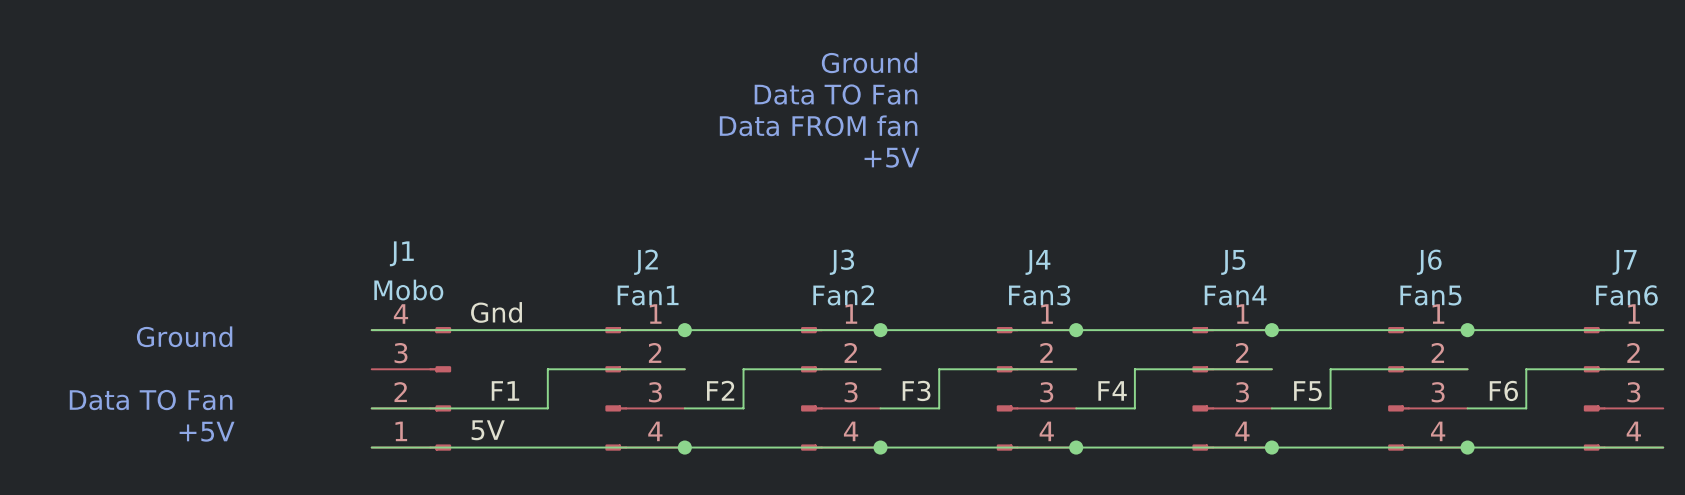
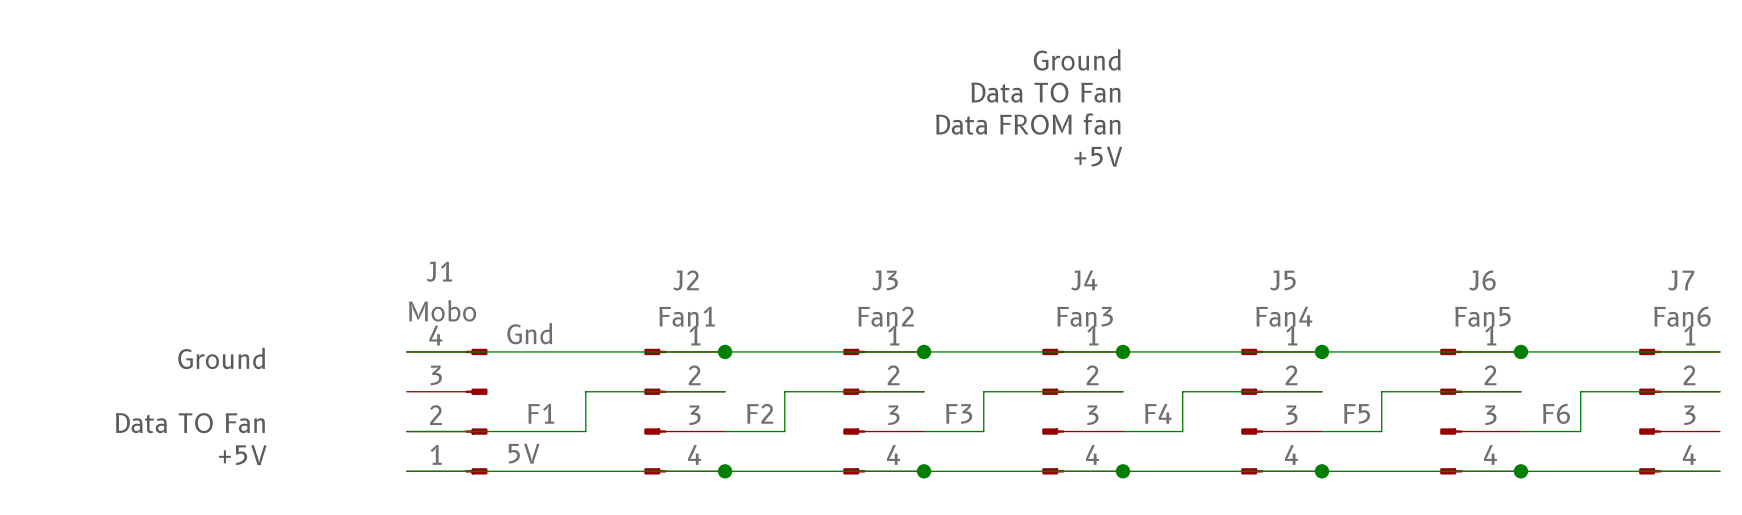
text position: Ground (869, 62) -> Ground (1077, 59)
text position: Data TO Fan (836, 94) -> Data TO Fan (1045, 92)
text position: Data FROM fan (818, 125) -> Data FROM fan (1028, 124)
text position: +5V (891, 157) -> +5V (1098, 156)

